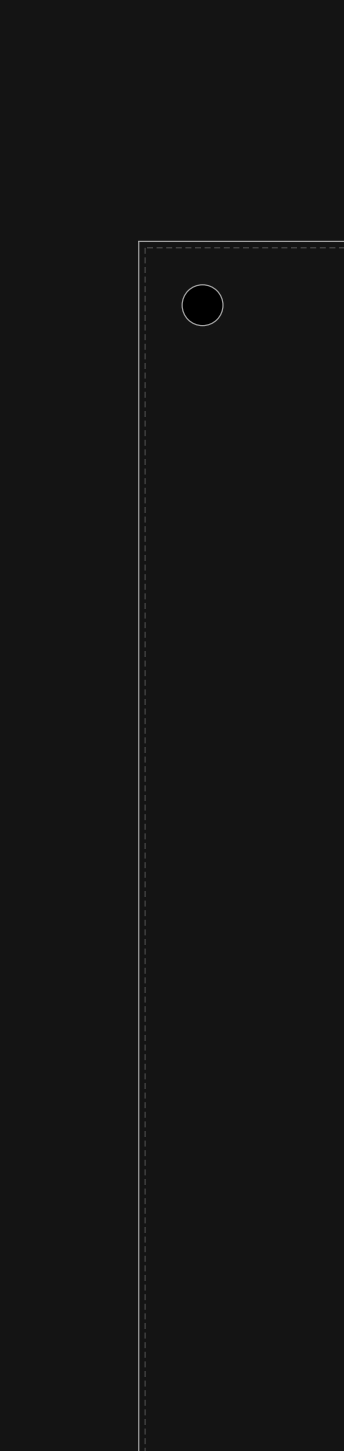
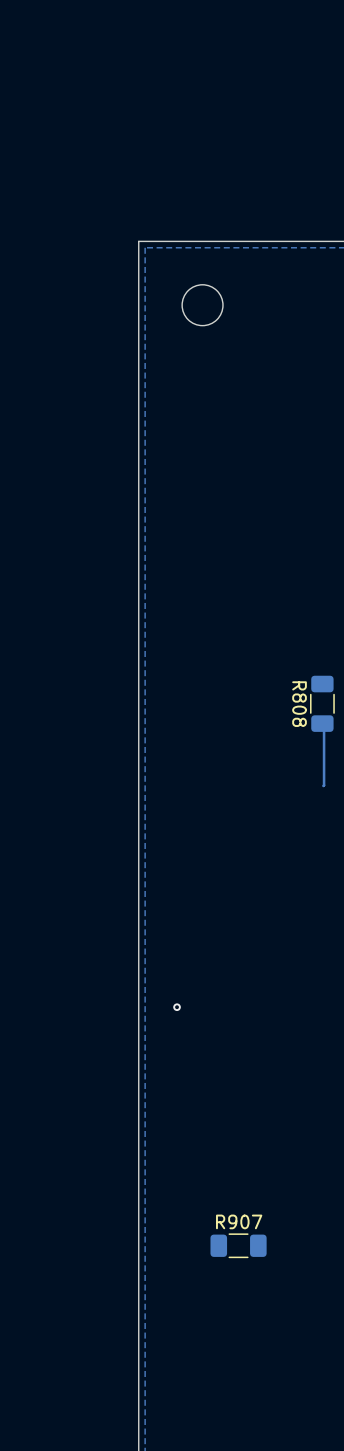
R808: none -> (322, 703)
track: none -> (322, 723) (324, 725) (323, 786)
via: none -> (177, 1007)
R907: none -> (238, 1245)

